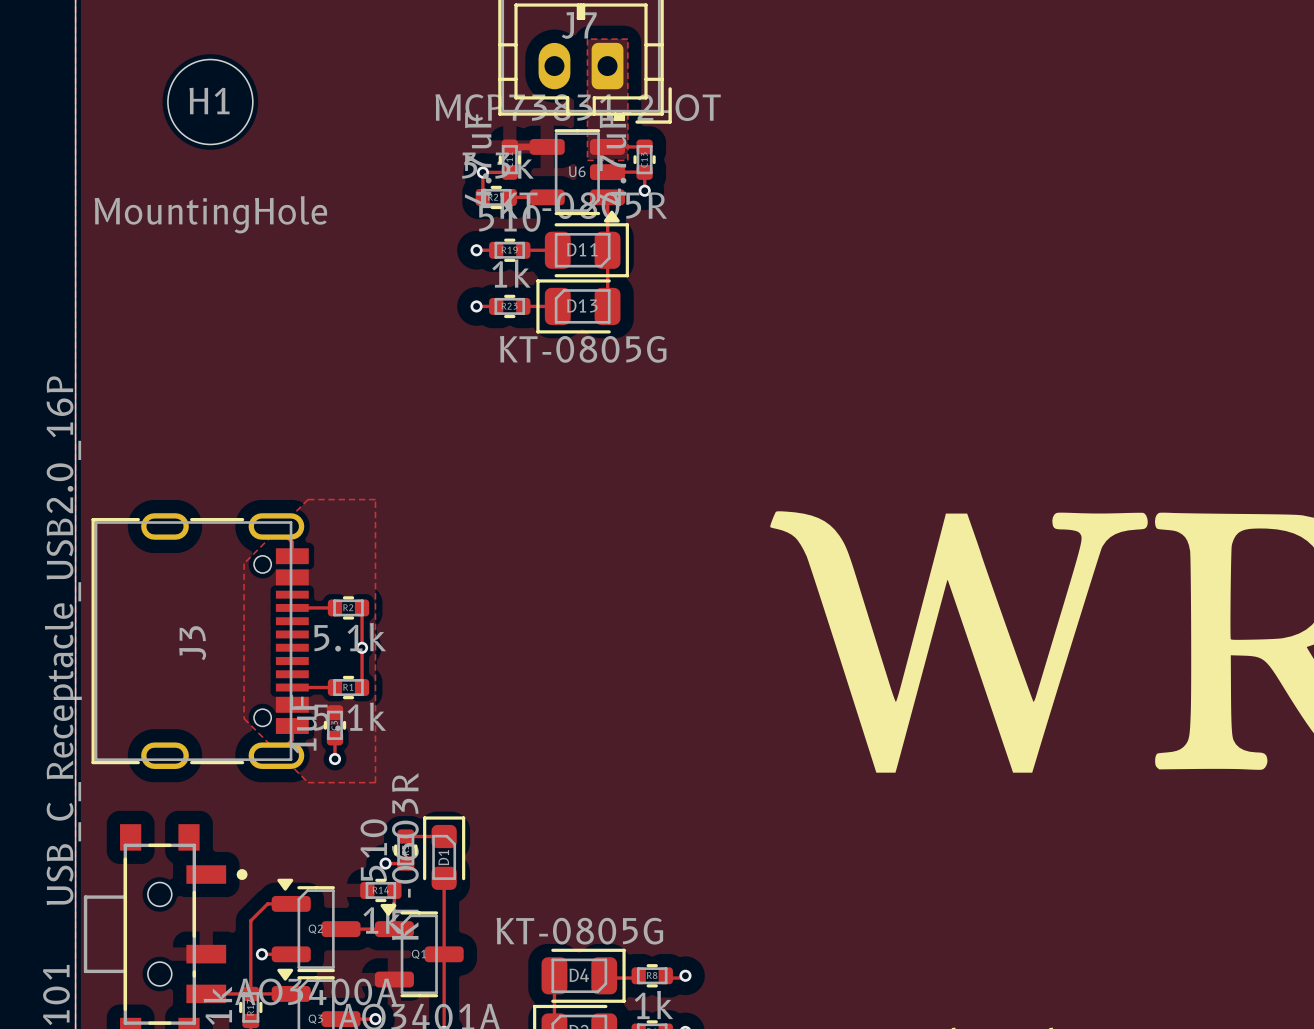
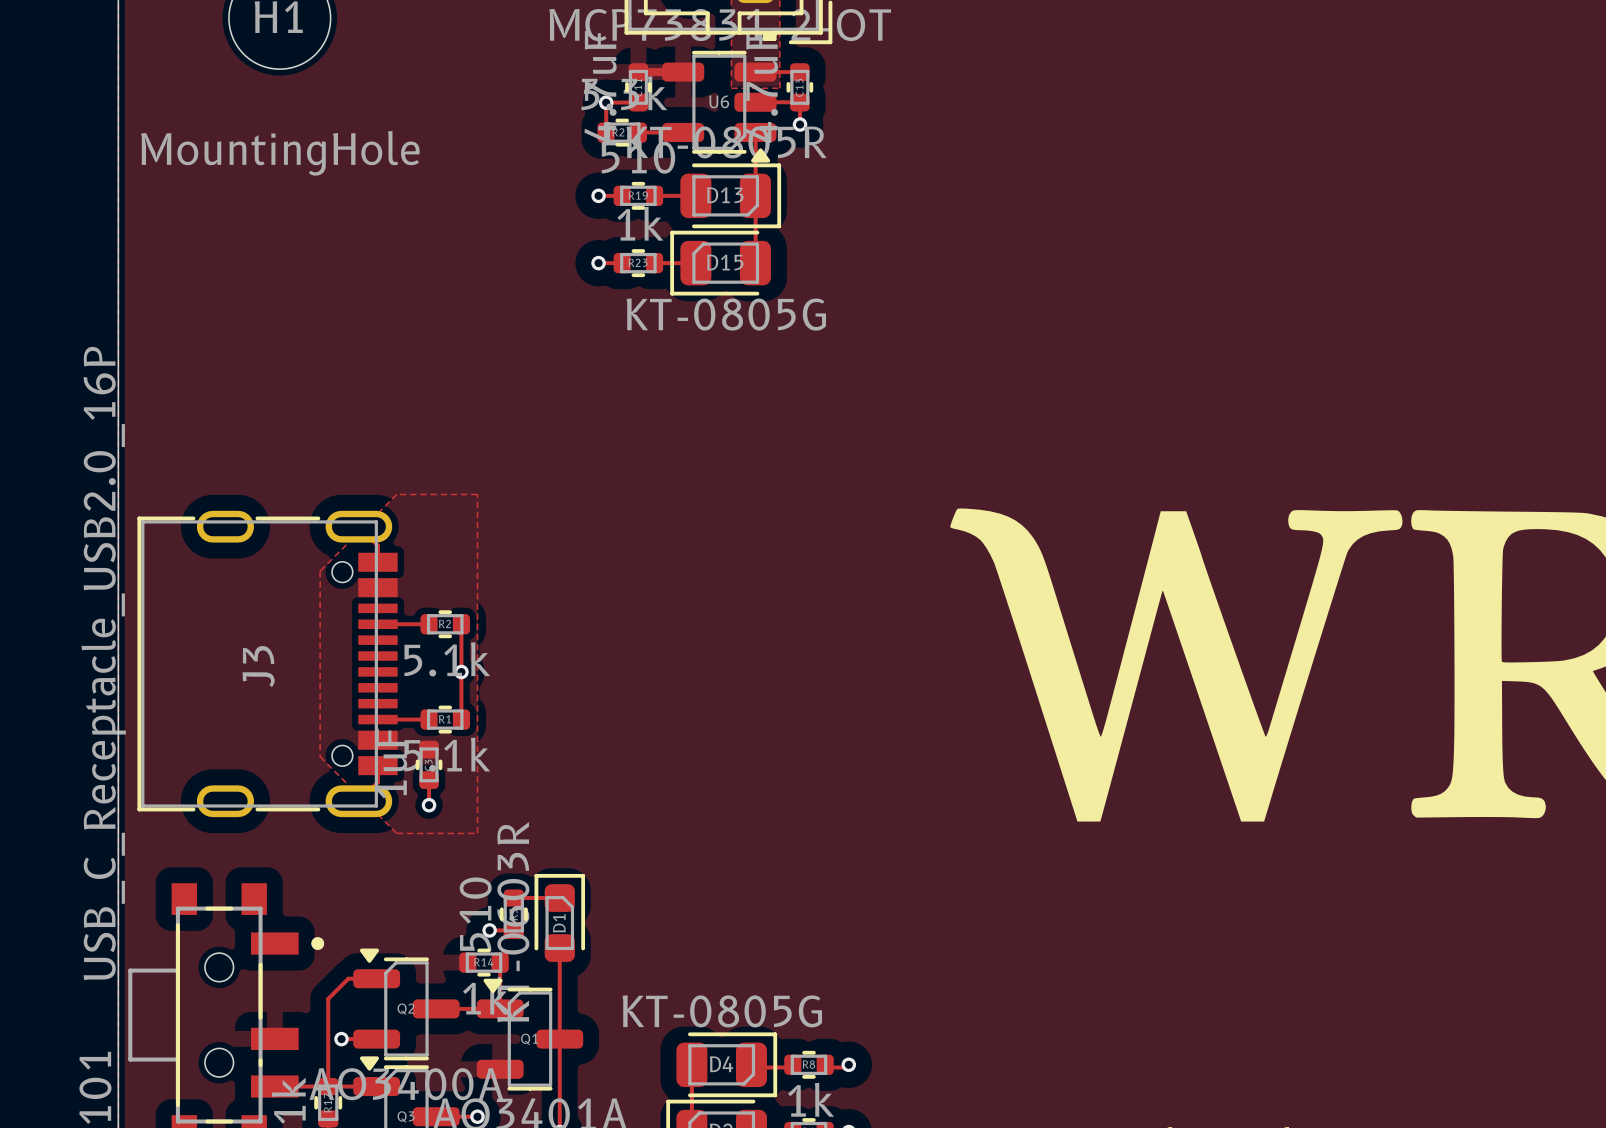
D11 name: D11 (582, 249) -> D13 (725, 195)
D13 name: D13 (582, 305) -> D15 (725, 262)

